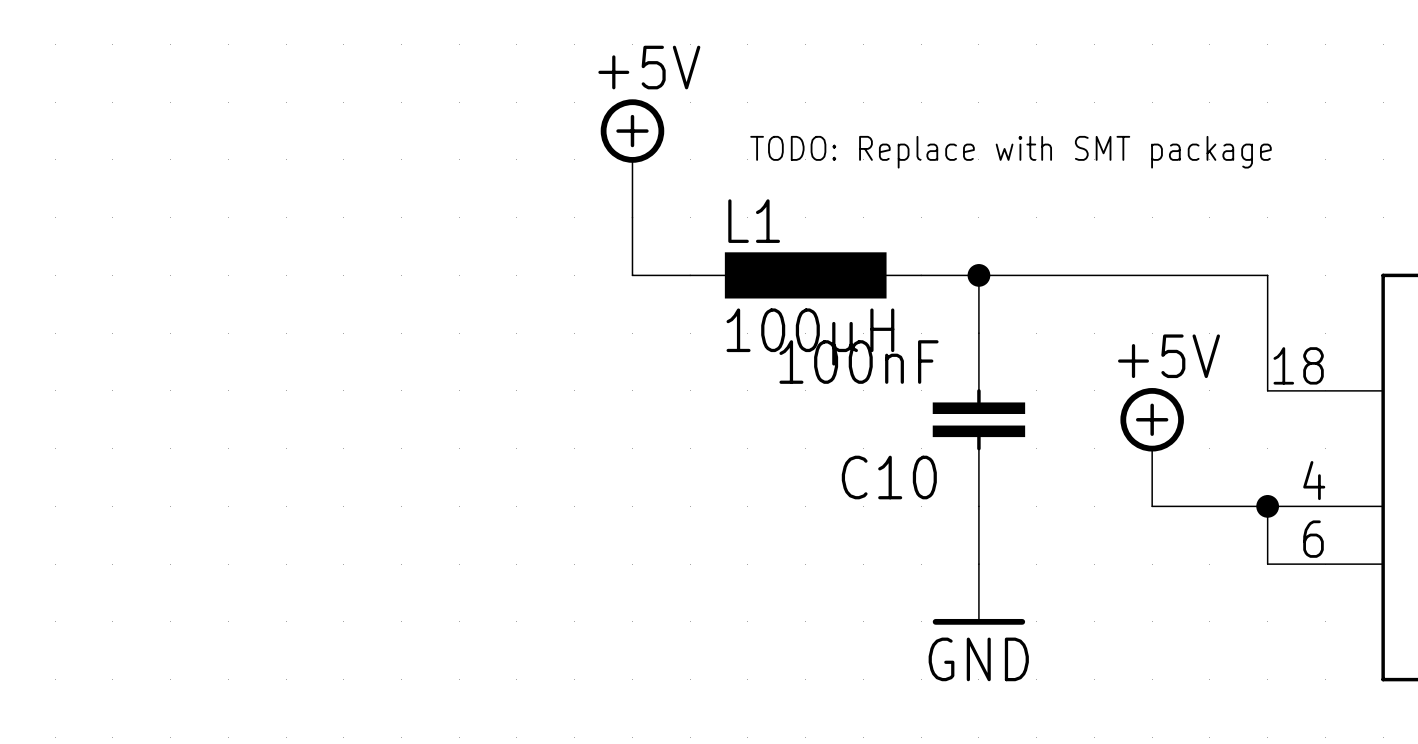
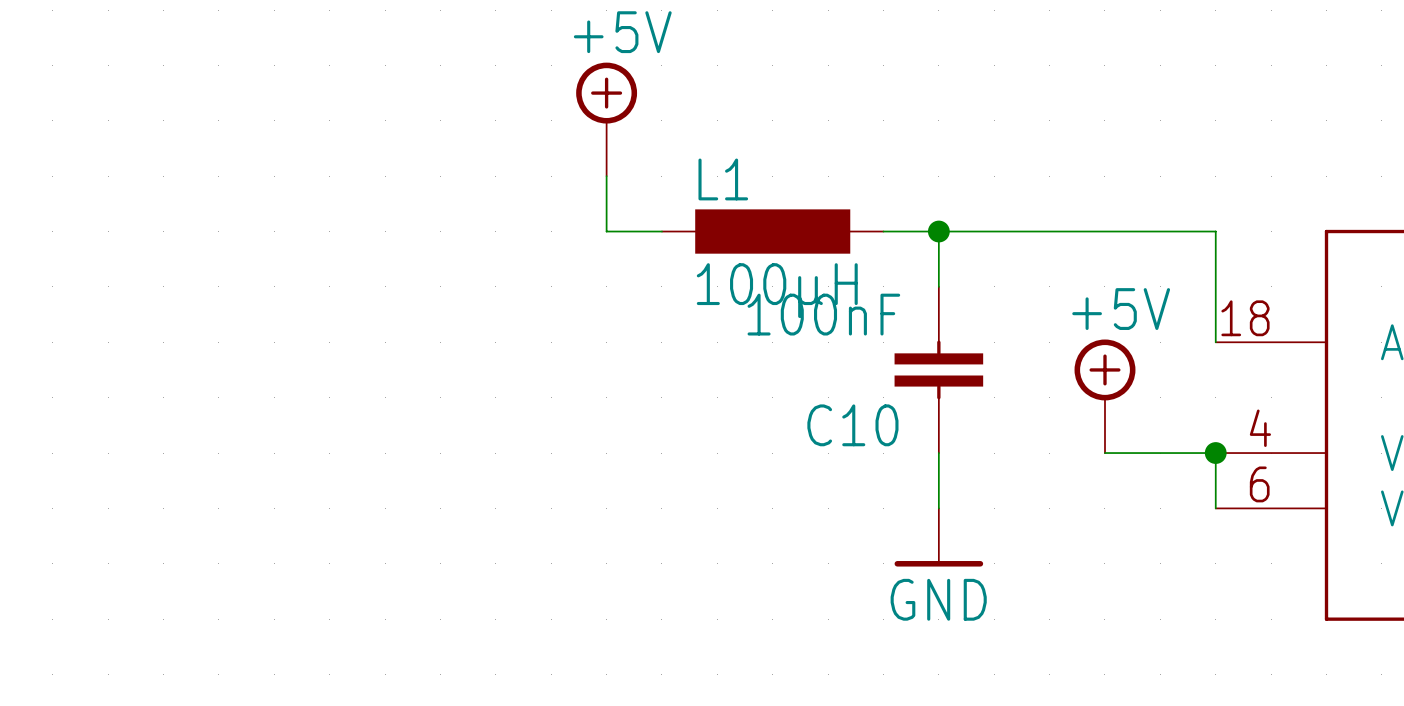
text: TODO: Replace with SMT package (1011, 152) -> none

